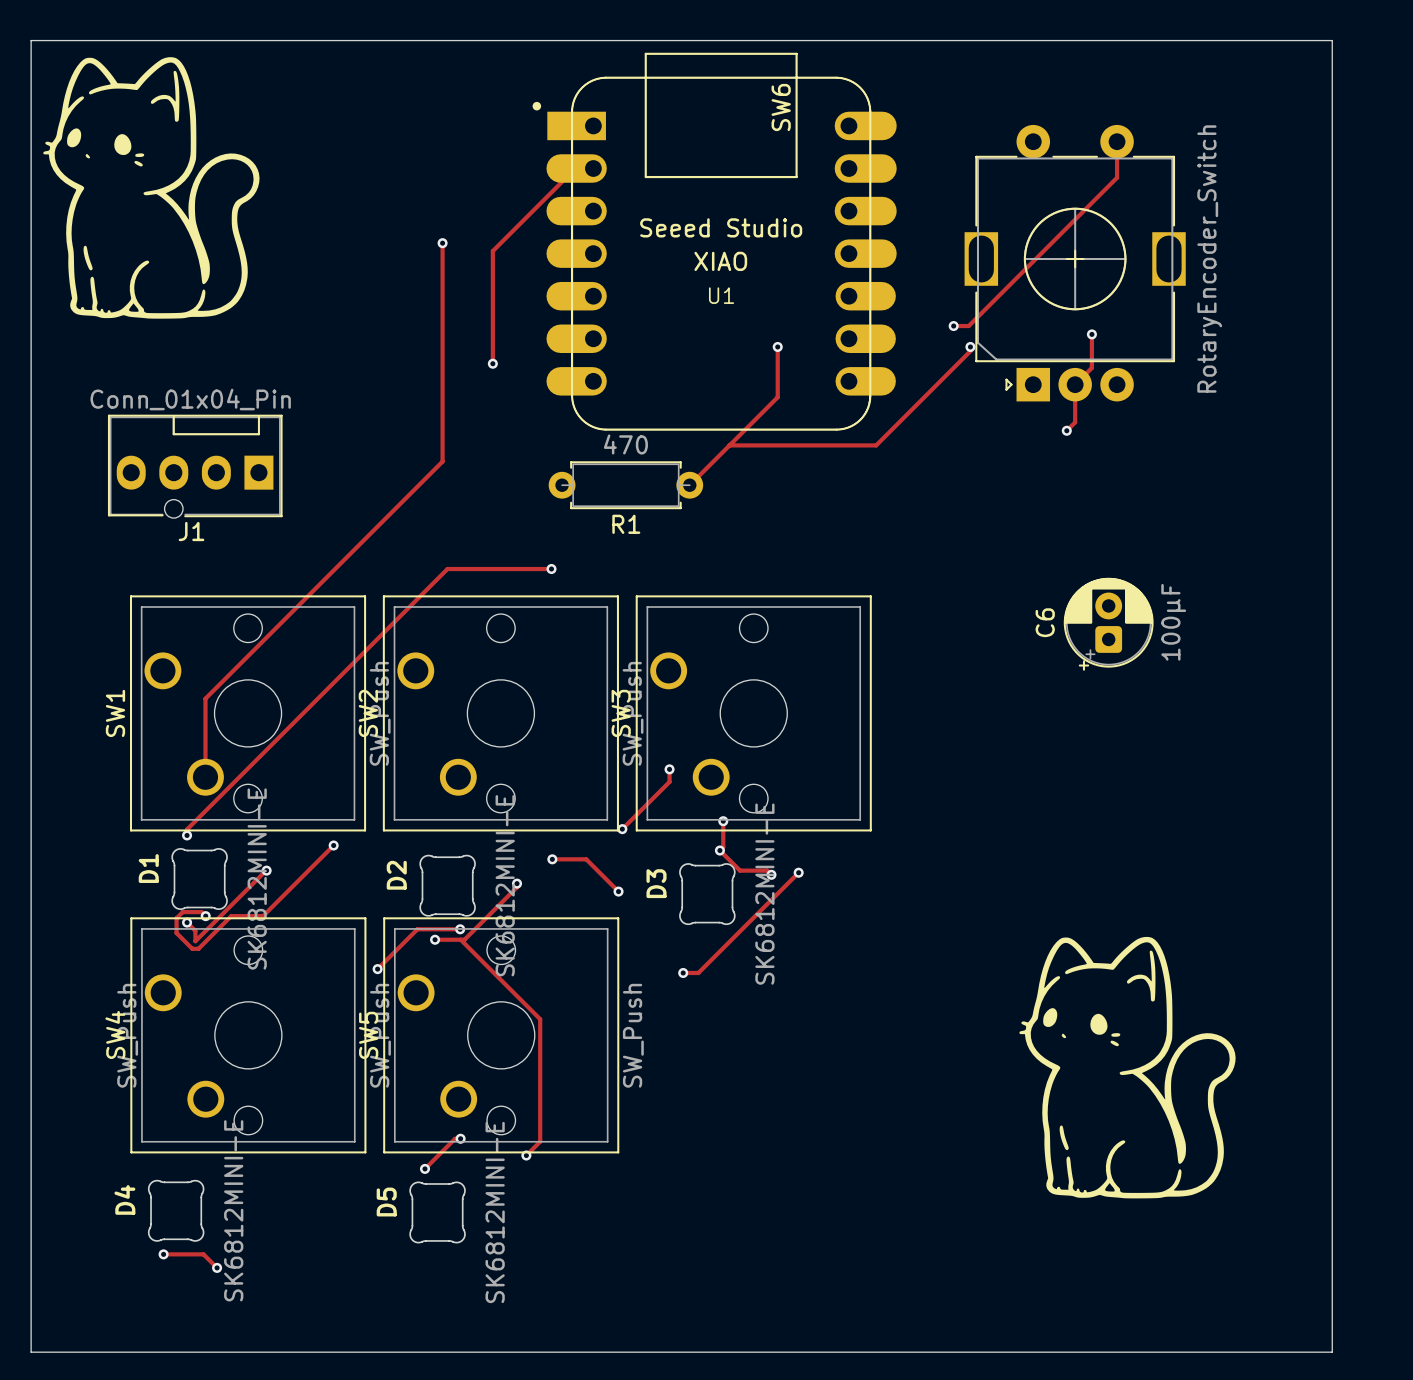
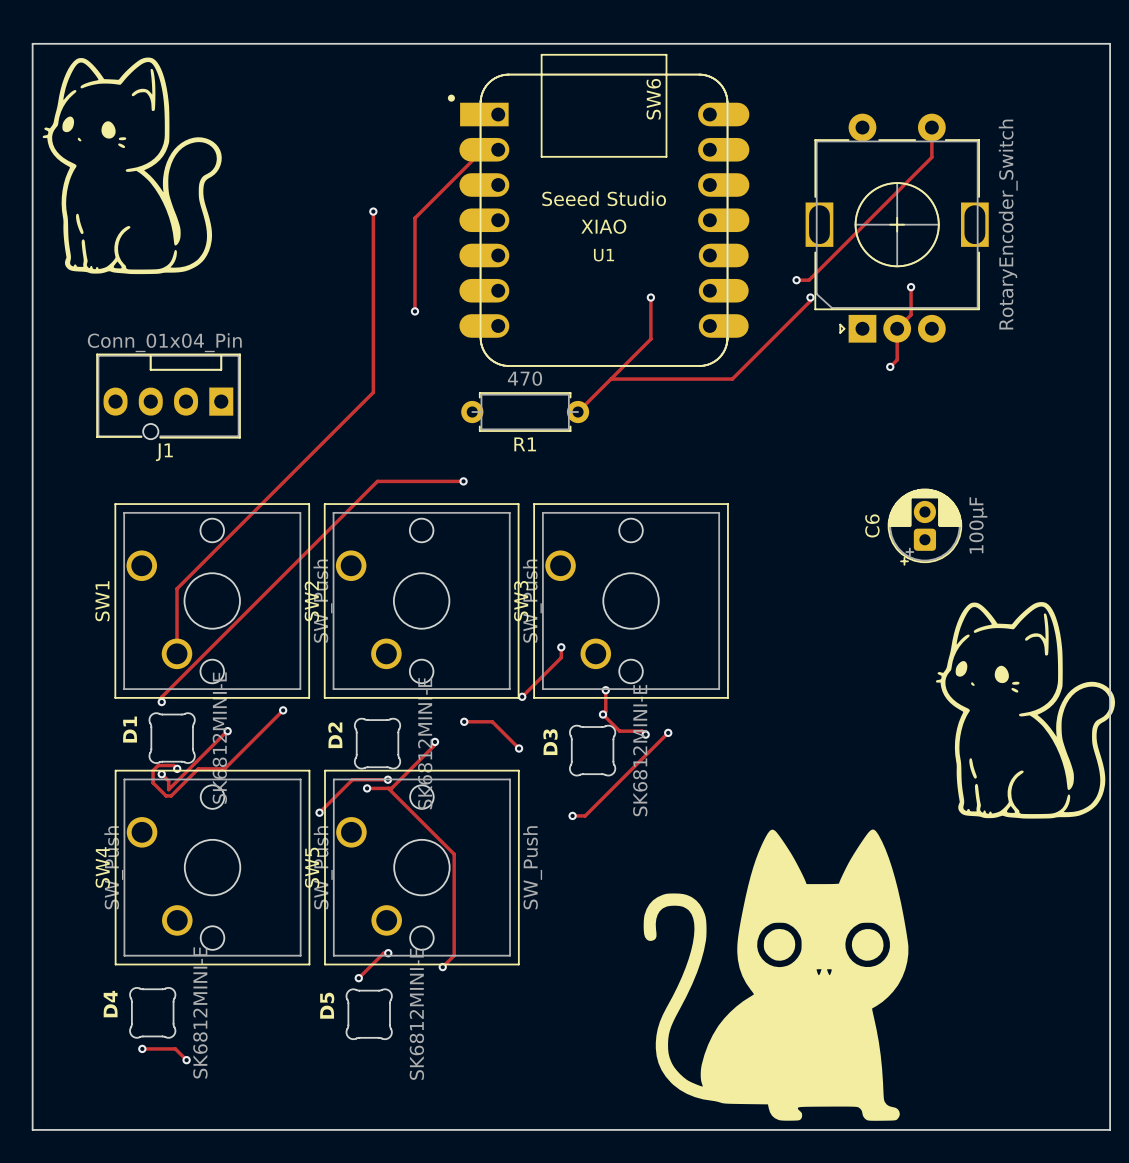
drawing: none -> [643, 829, 909, 1121]
drawing position: (1127, 1067) -> (1025, 710)

